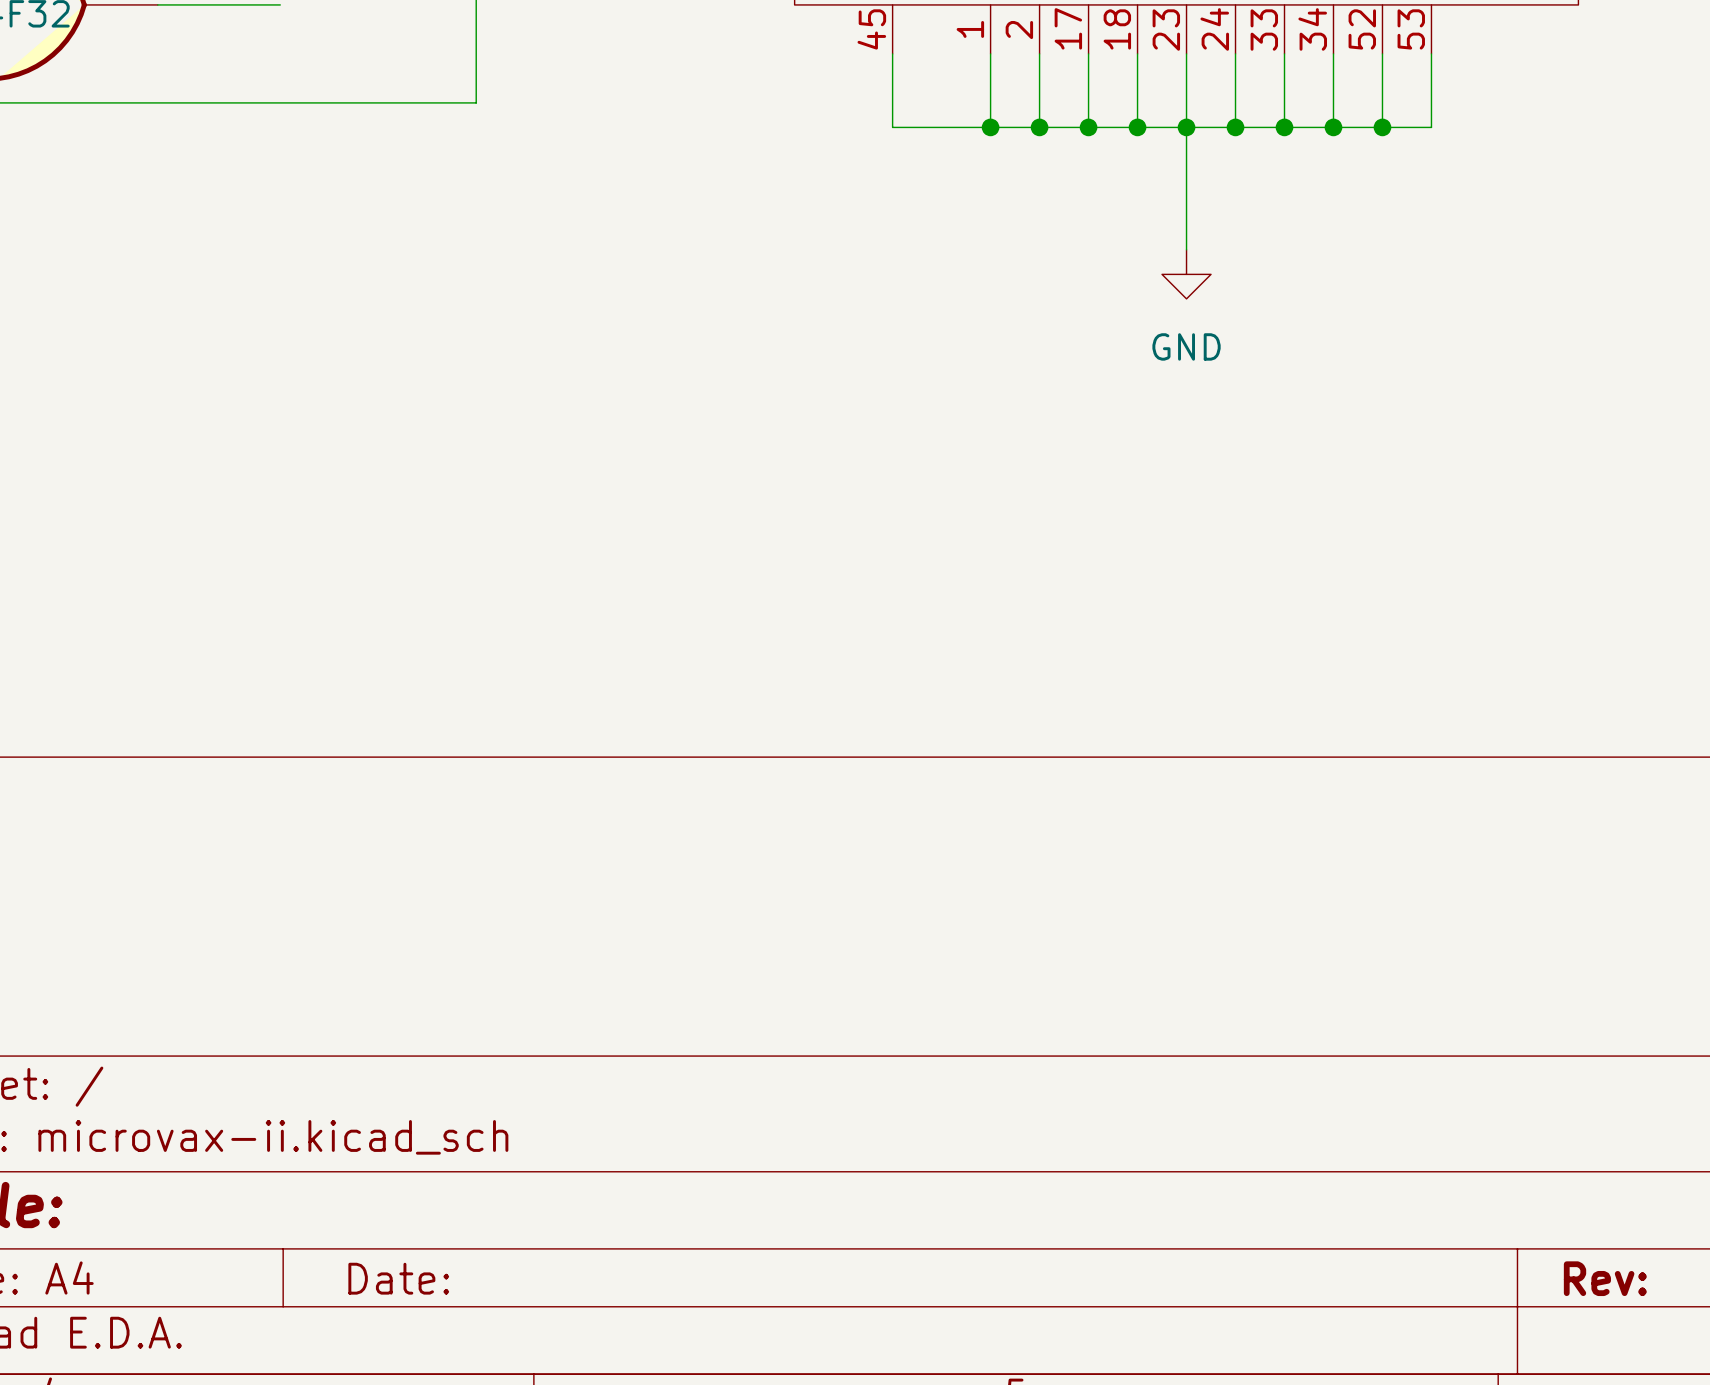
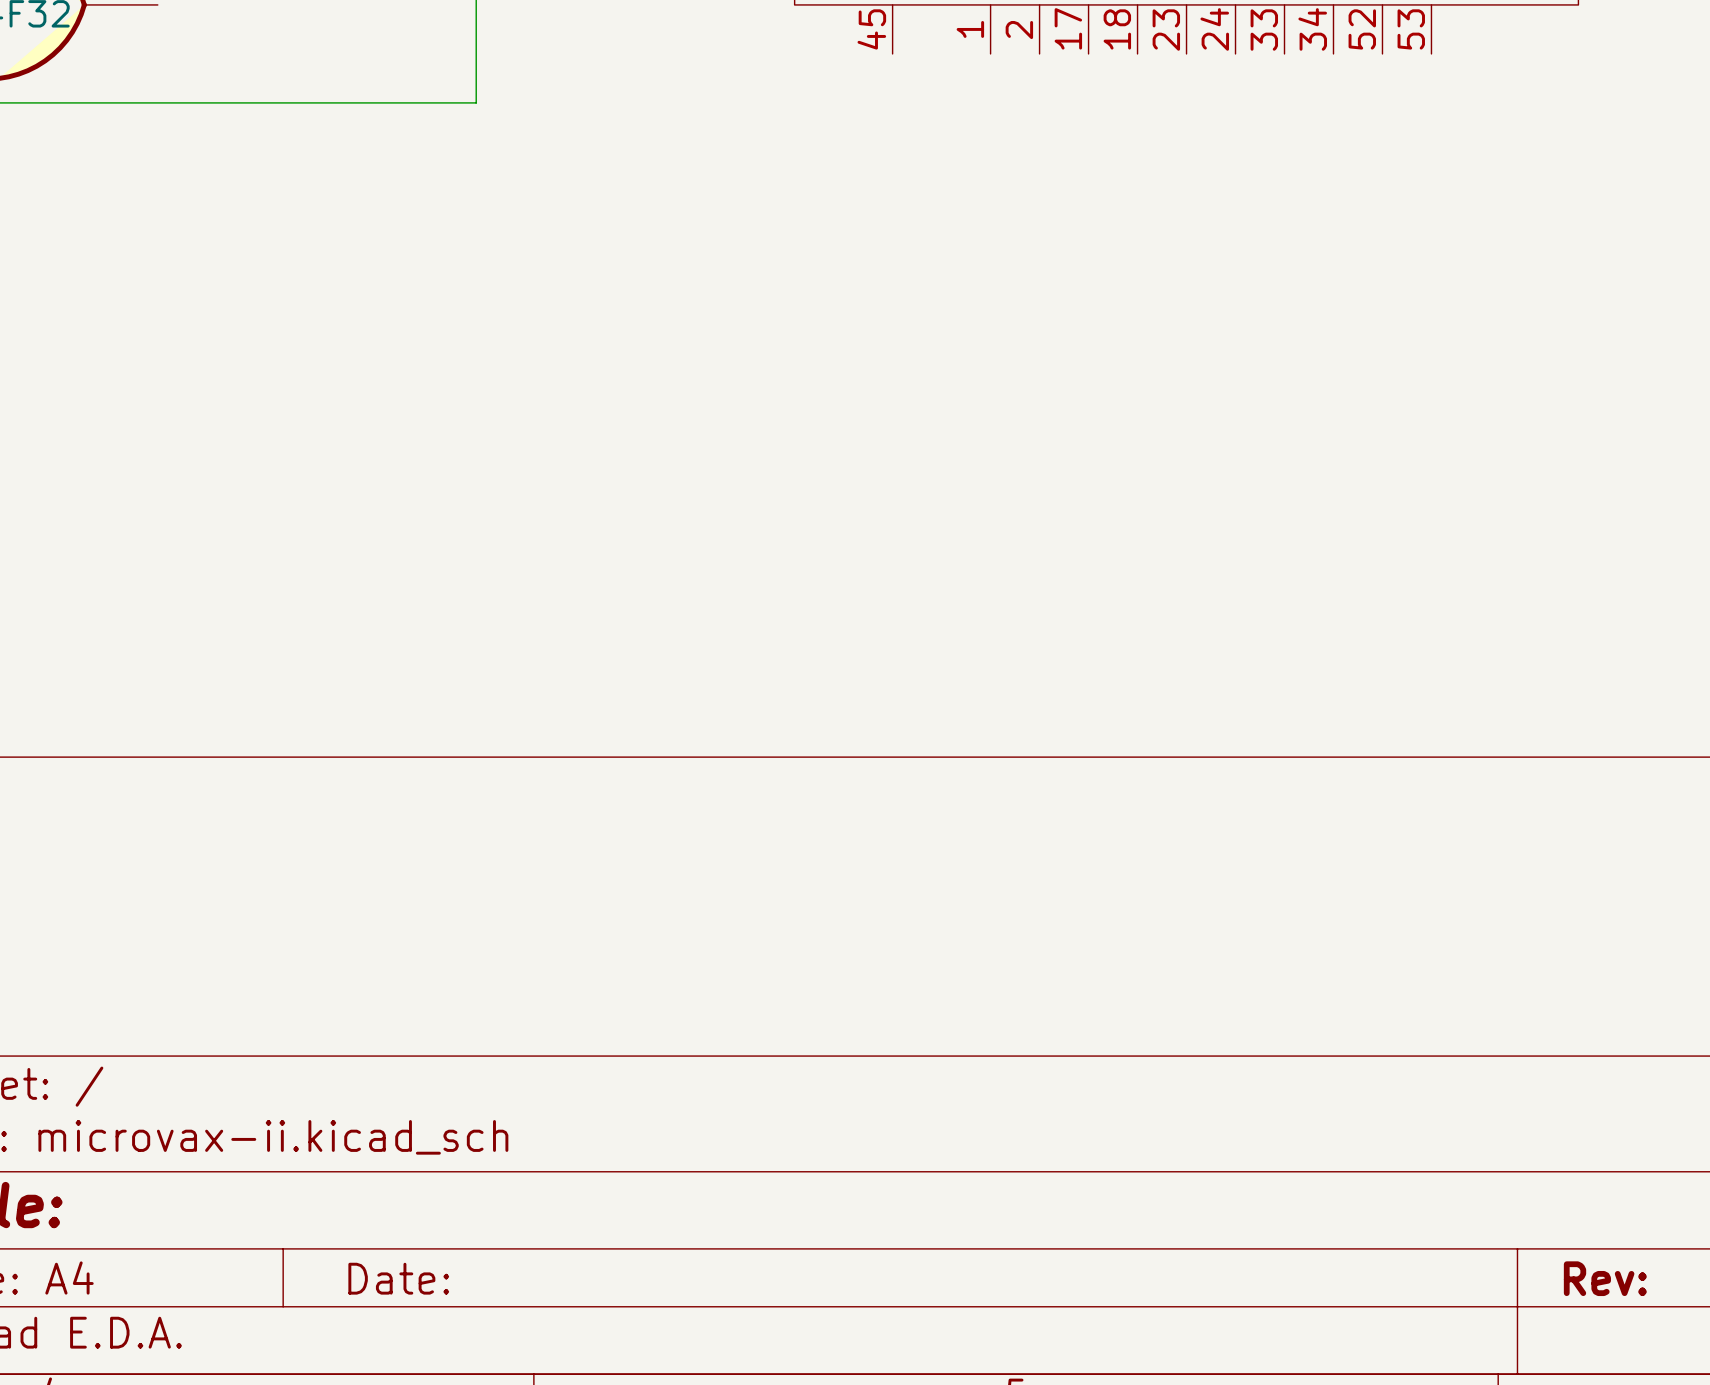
wire: (157, 4) (280, 4) -> none
wire: (892, 53) (892, 127) (1431, 127) (1431, 53) -> none
wire: (990, 53) (990, 127) -> none
wire: (1039, 53) (1039, 127) -> none
wire: (1088, 53) (1088, 127) -> none
wire: (1137, 53) (1137, 127) -> none
wire: (1186, 53) (1186, 249) -> none
wire: (1235, 53) (1235, 127) -> none
wire: (1284, 53) (1284, 127) -> none
wire: (1333, 53) (1333, 127) -> none
wire: (1382, 53) (1382, 127) -> none
junction: (990, 127) -> none
junction: (1039, 127) -> none
junction: (1088, 127) -> none
junction: (1137, 127) -> none
junction: (1186, 127) -> none
junction: (1235, 127) -> none
junction: (1284, 127) -> none
junction: (1333, 127) -> none
junction: (1382, 127) -> none
power symbol: GND (1186, 274) -> none

